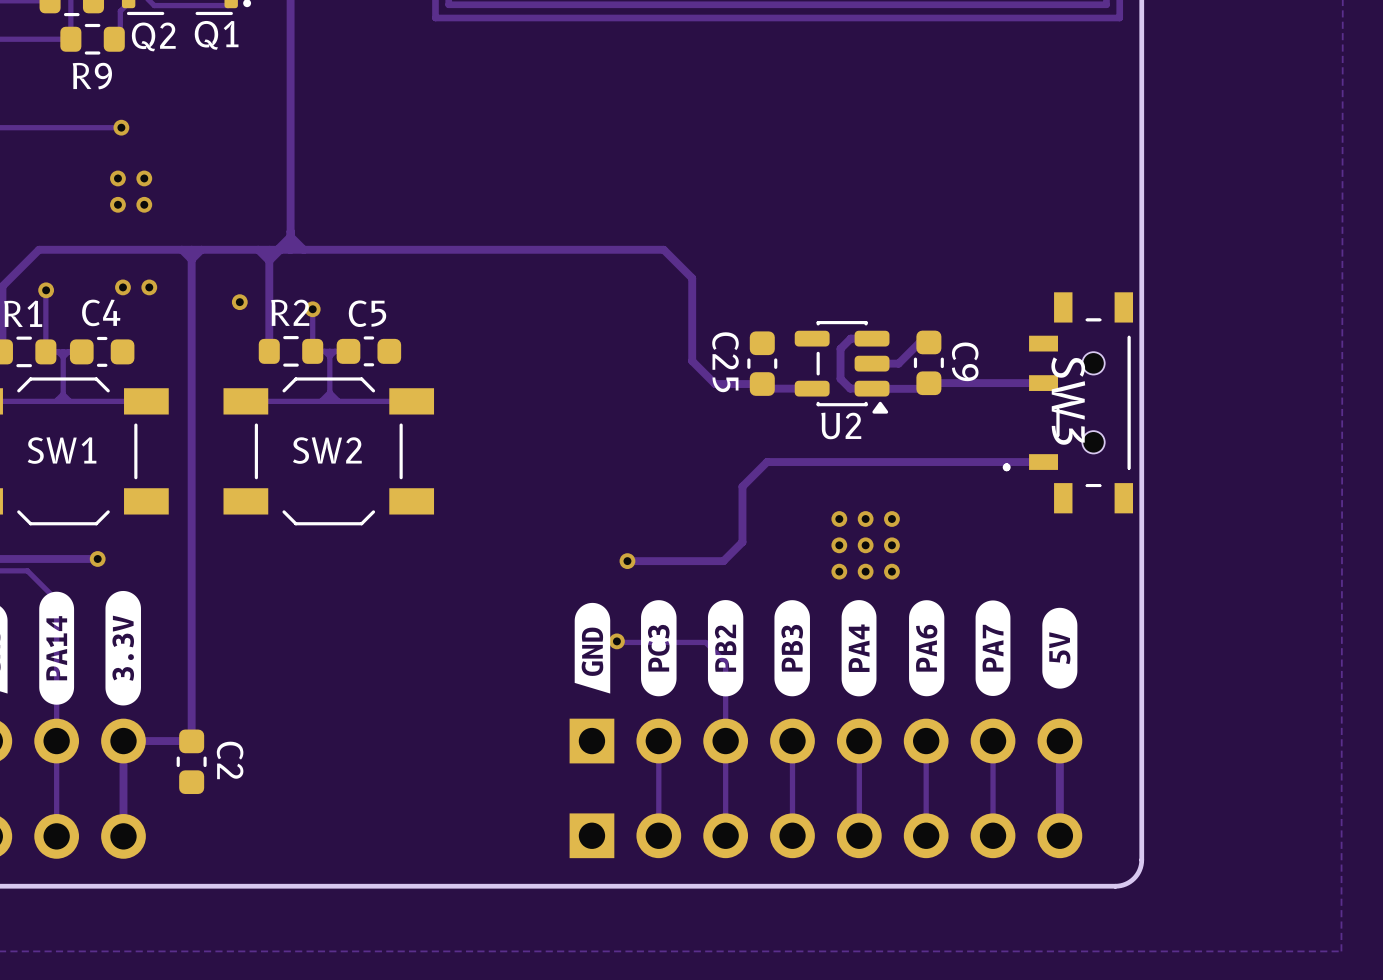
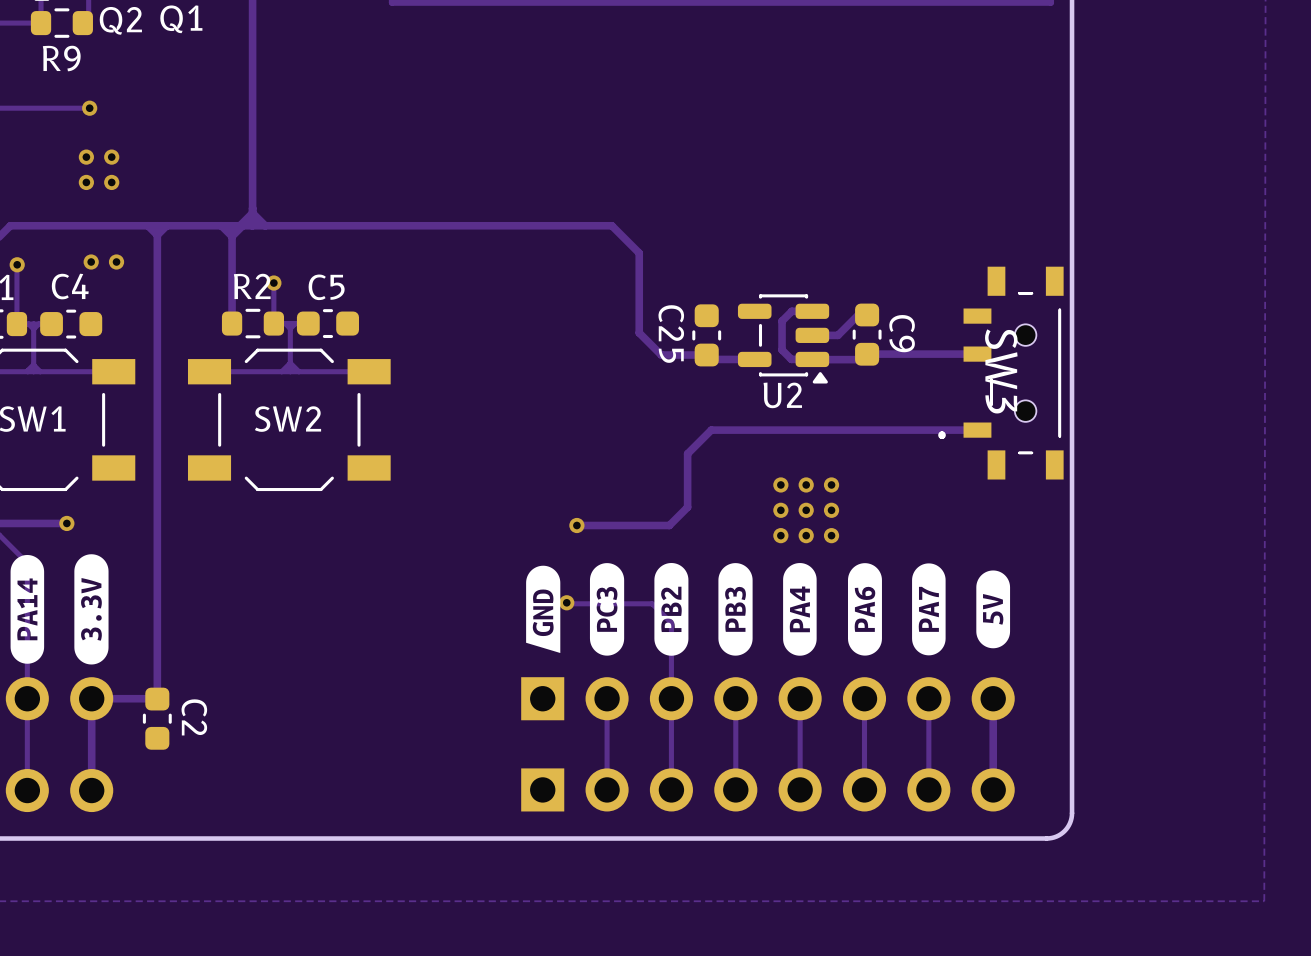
via: (239, 302) -> none

